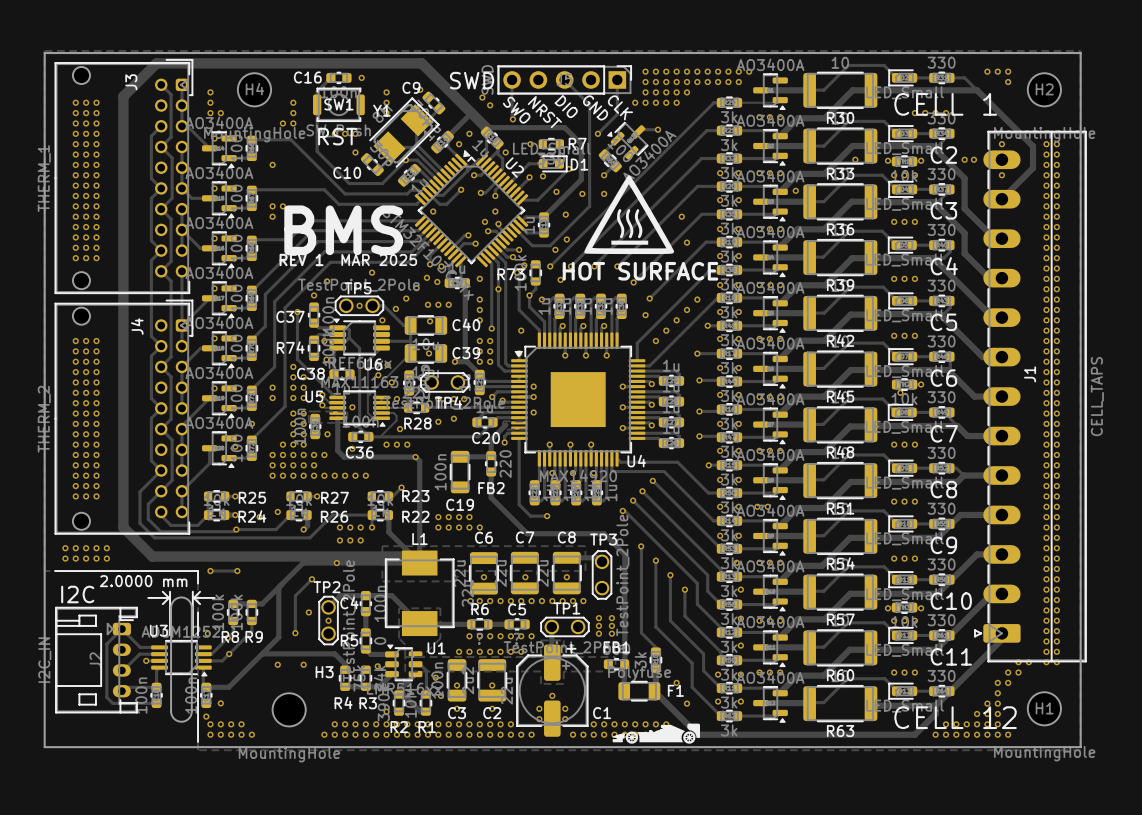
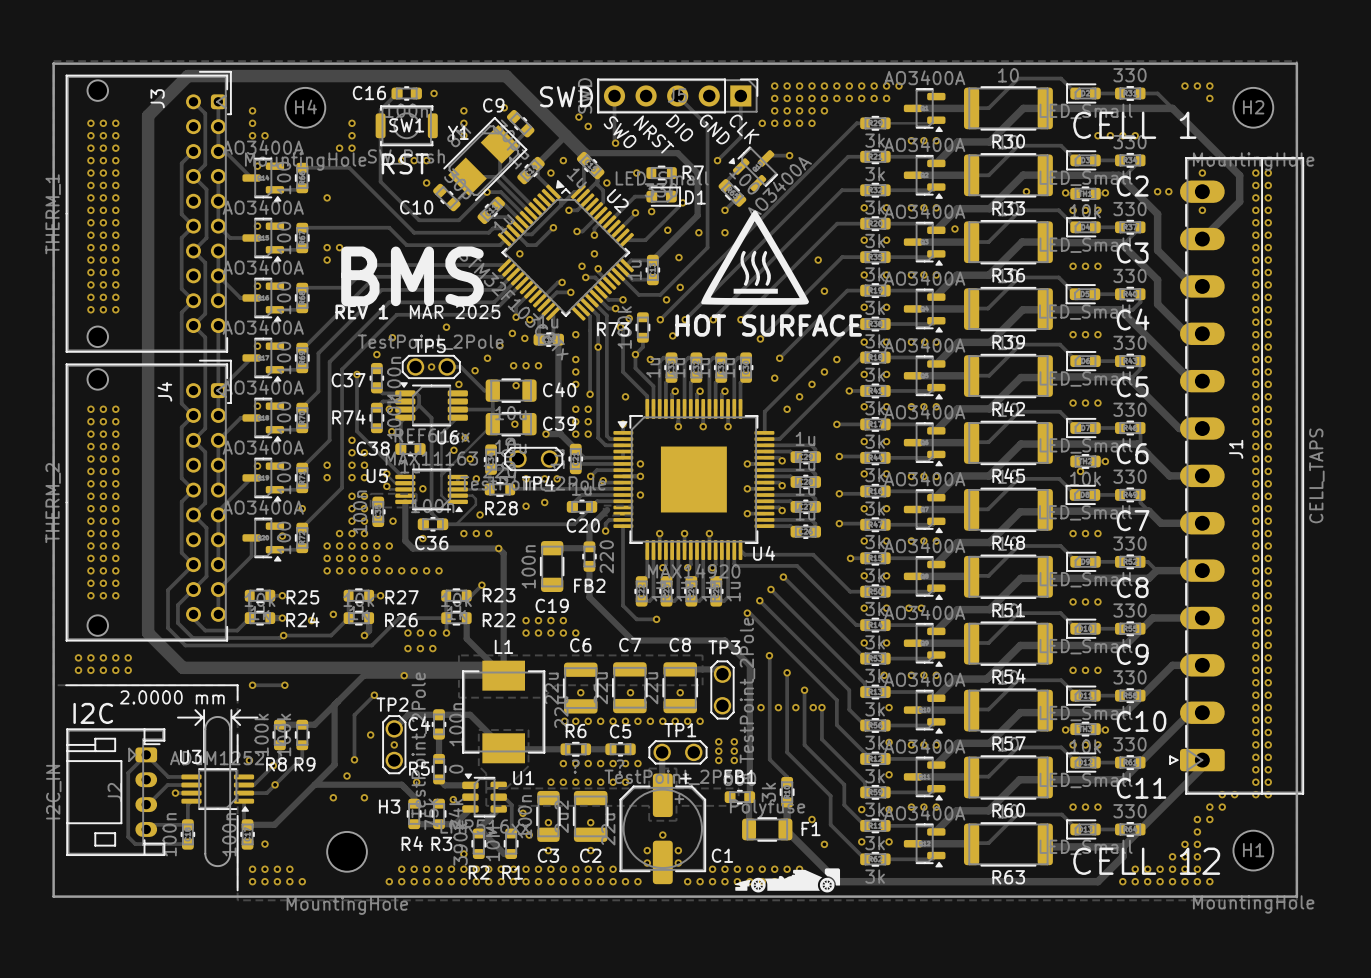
via: none -> (761, 707)
via: none -> (778, 707)
via: none -> (795, 707)
via: none -> (813, 707)
via: none -> (347, 776)
via: none -> (416, 782)
via: (206, 716) -> none

